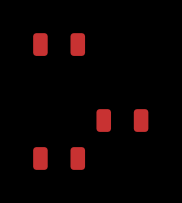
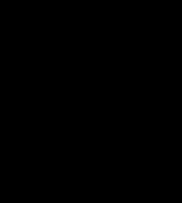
part: (59, 44) -> none
part: (122, 120) -> none
part: (59, 158) -> none

